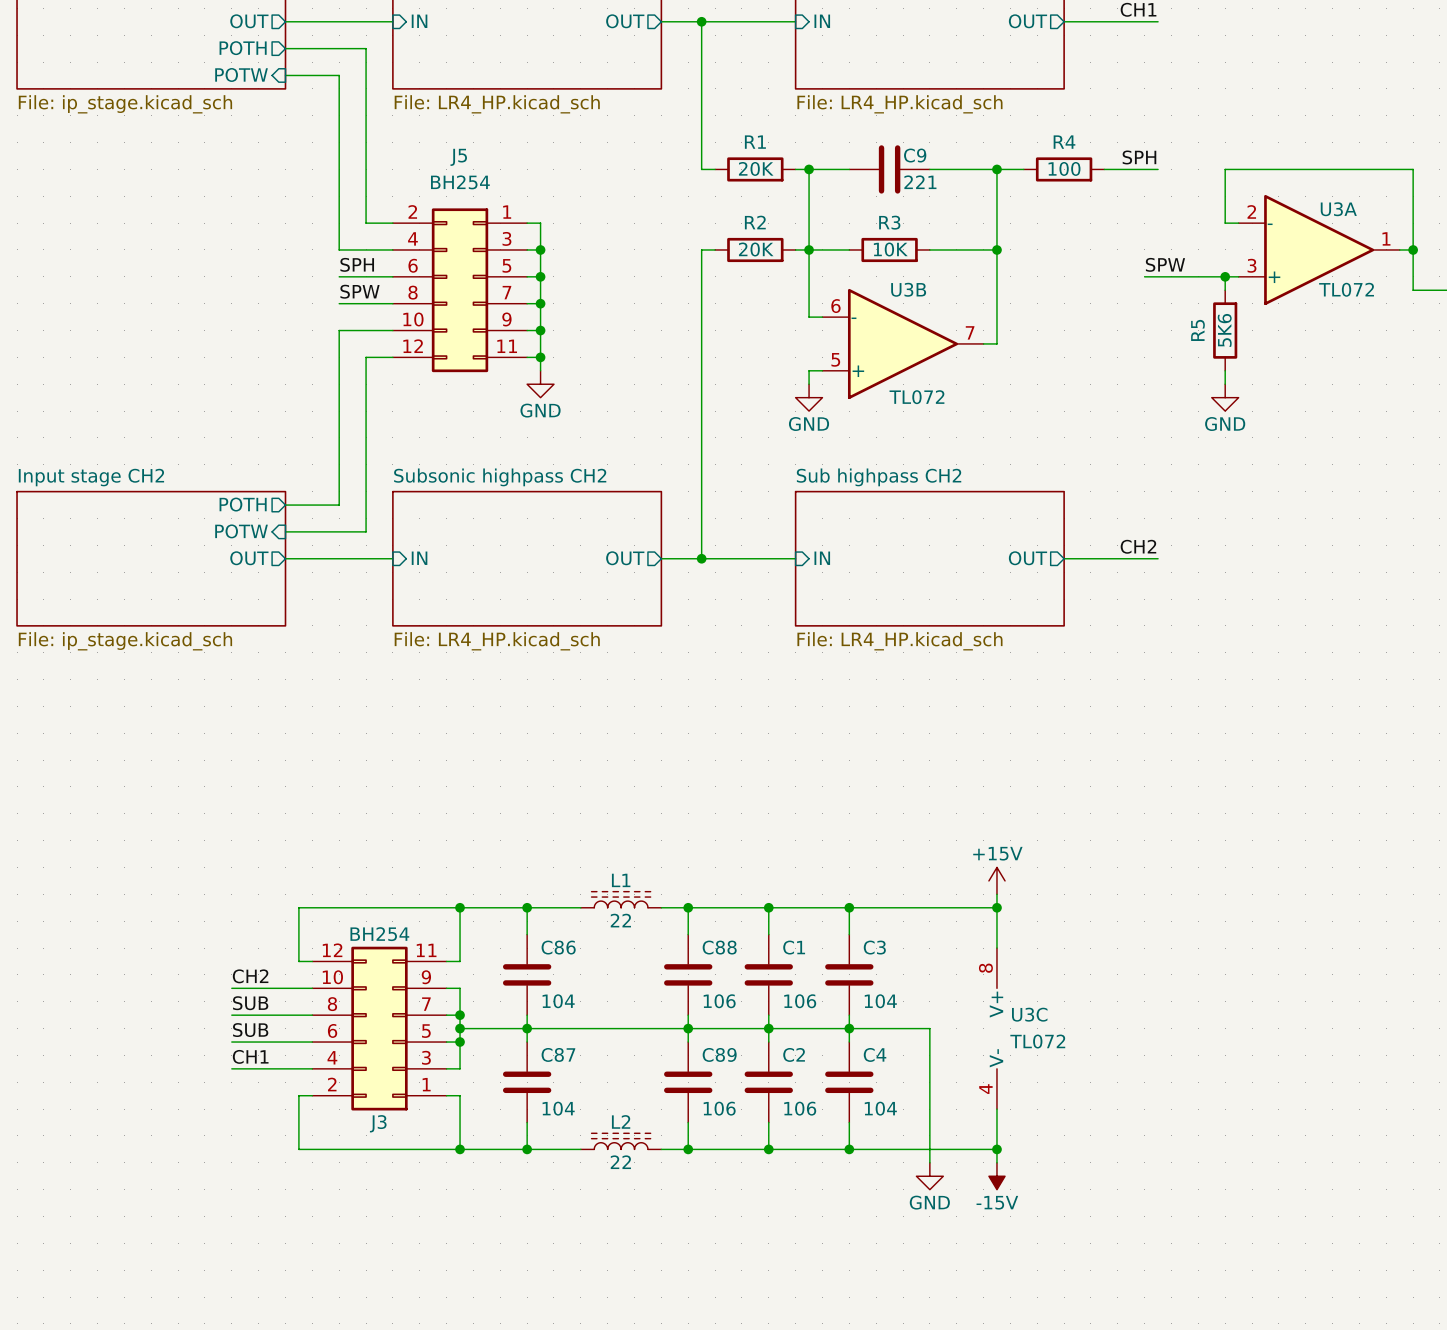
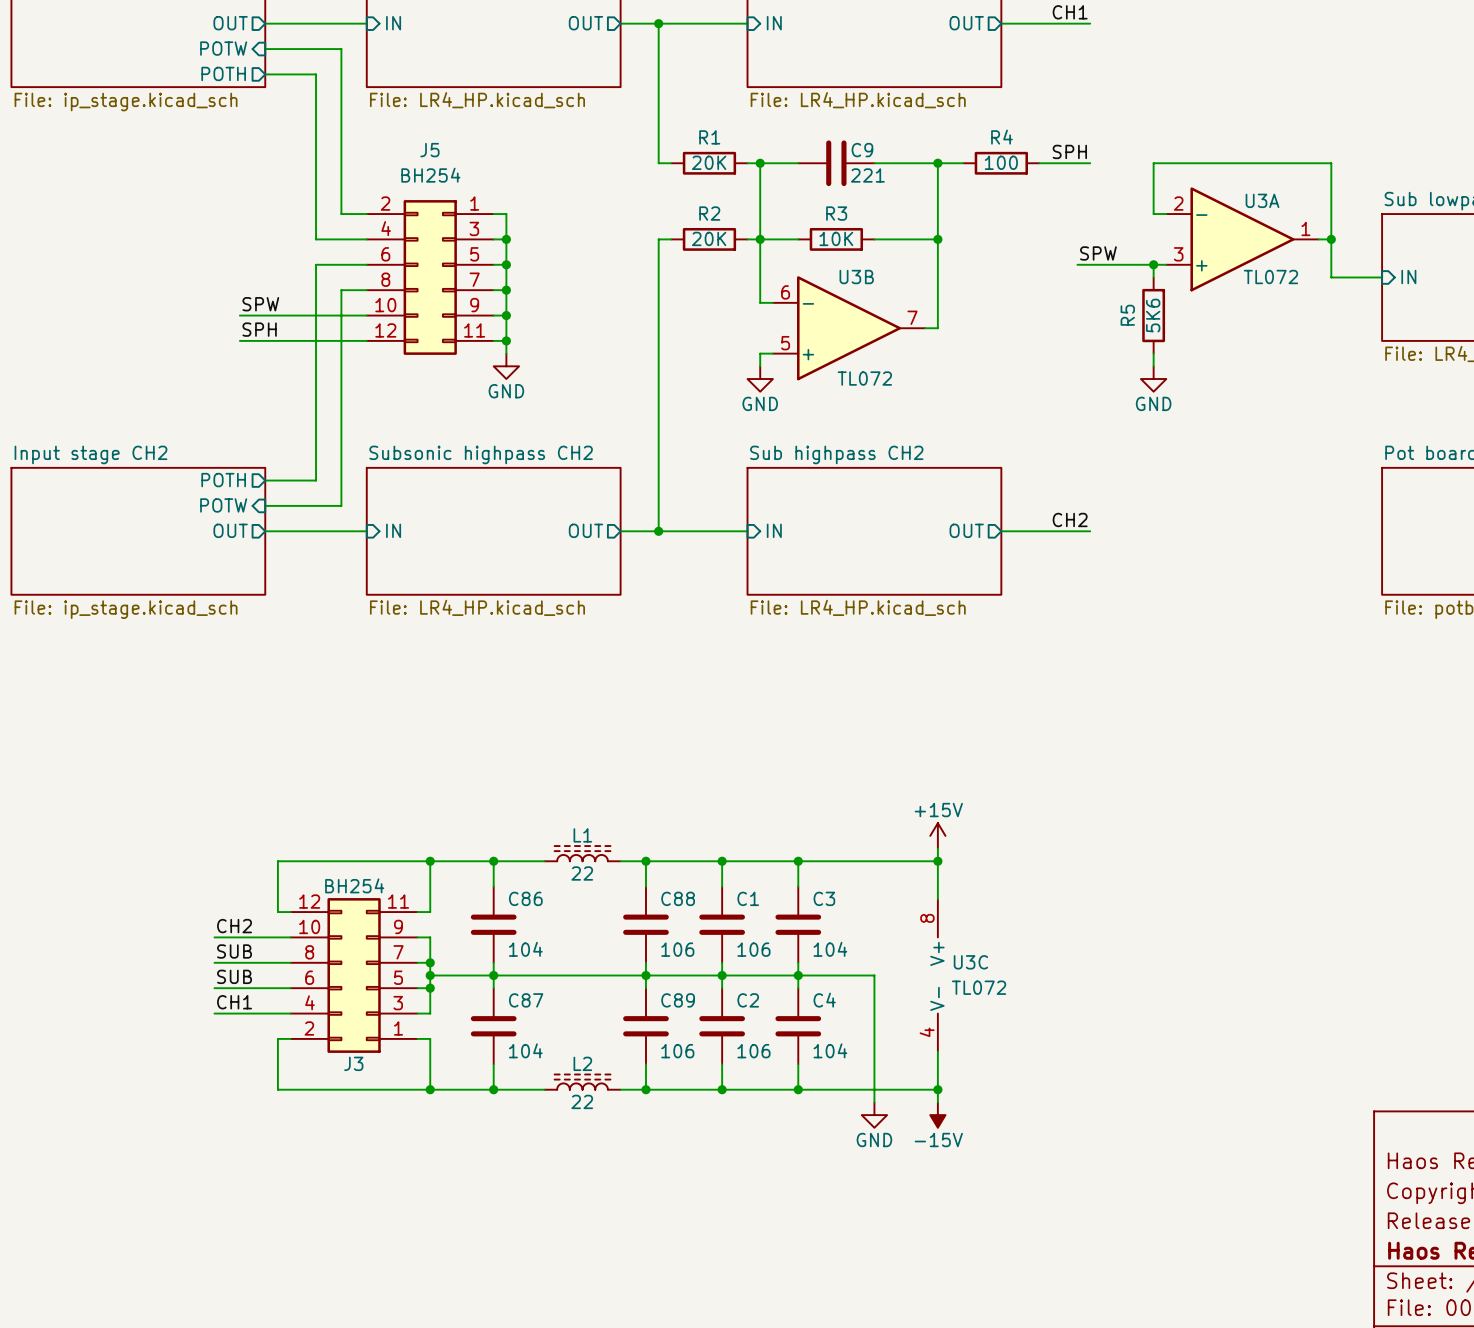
sheet pin shape: output (243, 48) -> input (223, 48)
sheet pin: POTH (243, 48) -> POTW (223, 48)
sheet pin shape: input (241, 74) -> output (223, 73)
sheet pin: POTW (241, 74) -> POTH (223, 73)
label position: SPH (357, 264) -> SPH (259, 329)
wire: none -> (316, 264) (316, 315) (239, 315)
label position: SPW (360, 291) -> SPW (260, 304)
wire: (339, 303) (366, 303) -> (239, 340) (341, 340) (341, 290)

